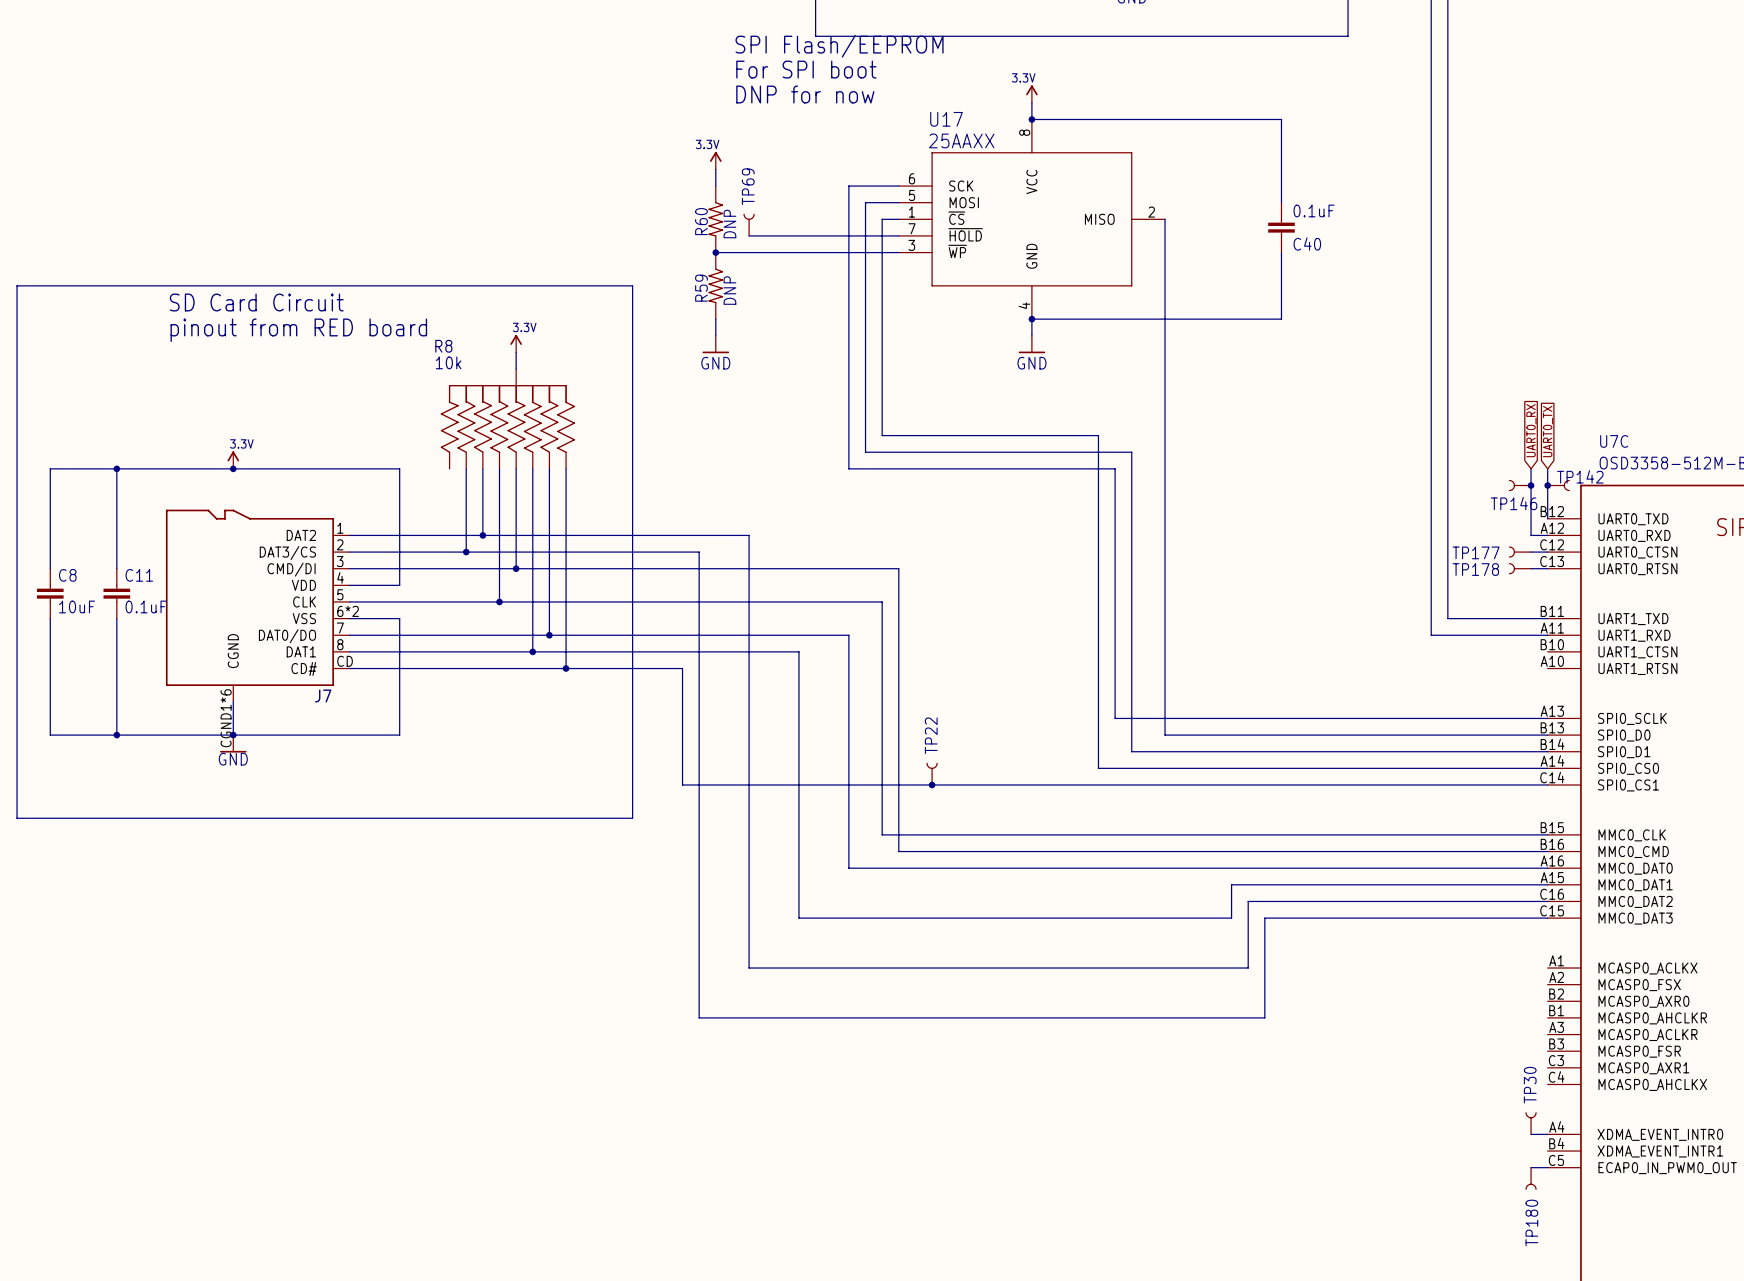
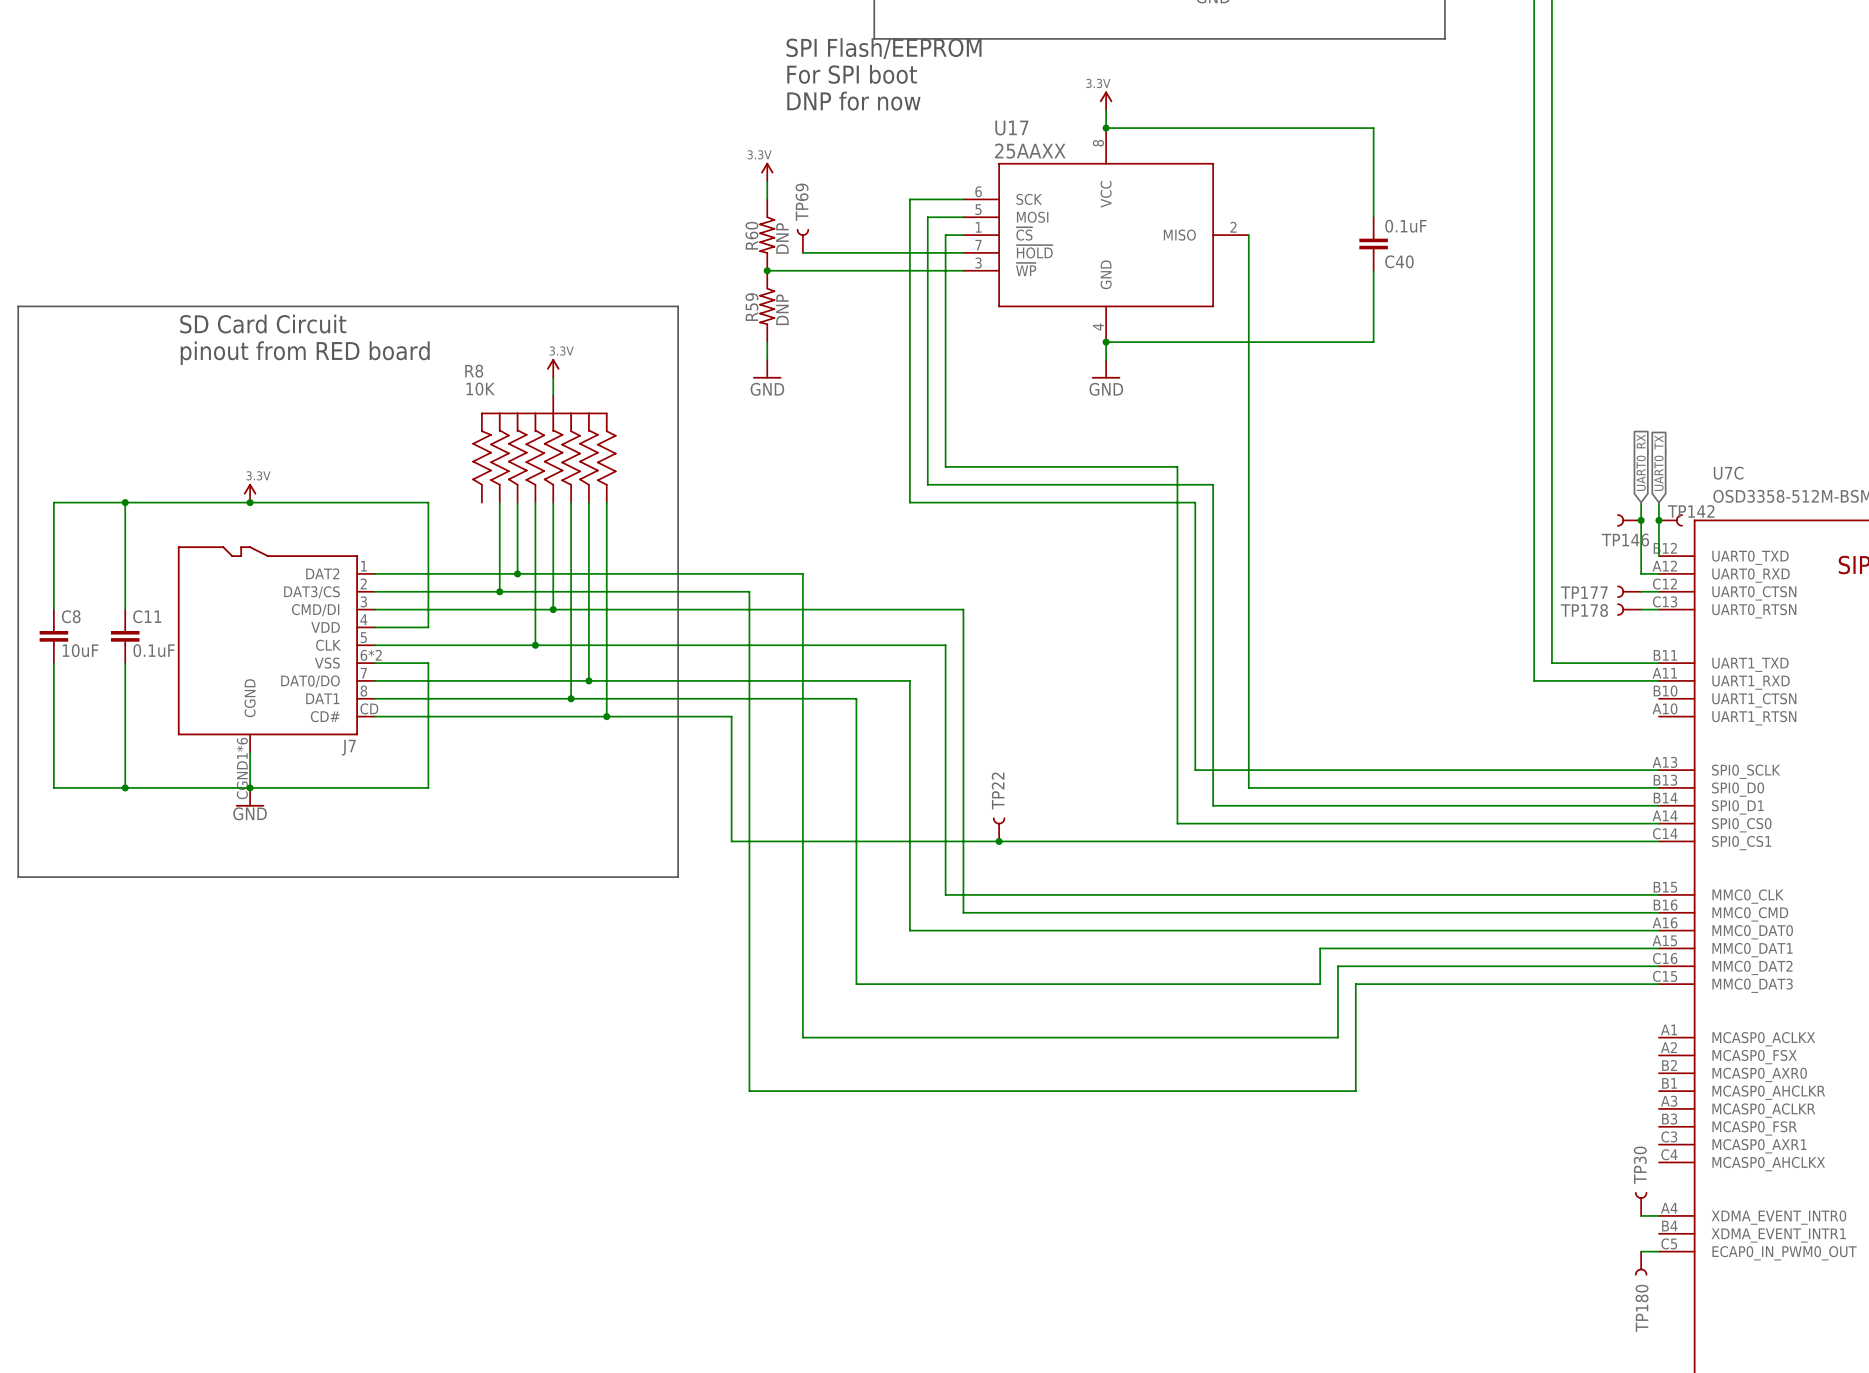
R8 value: 10k (448, 362) -> 10K (480, 389)

